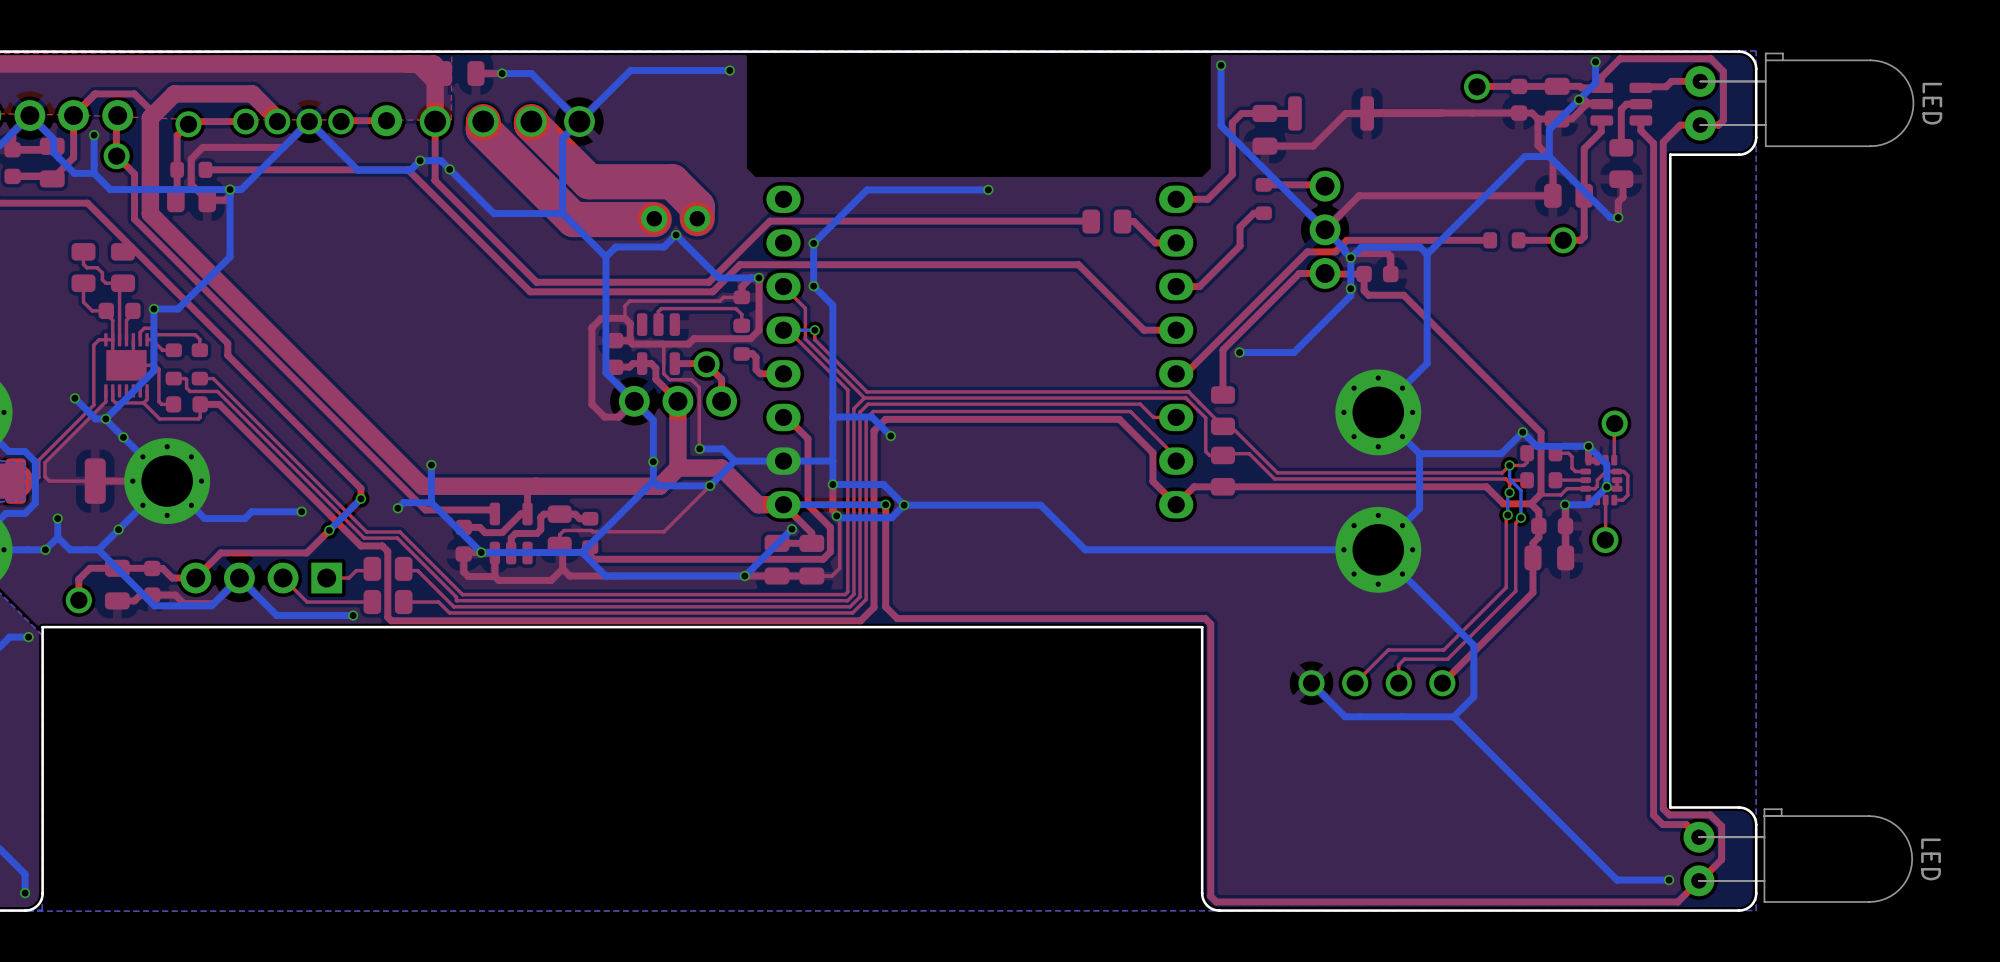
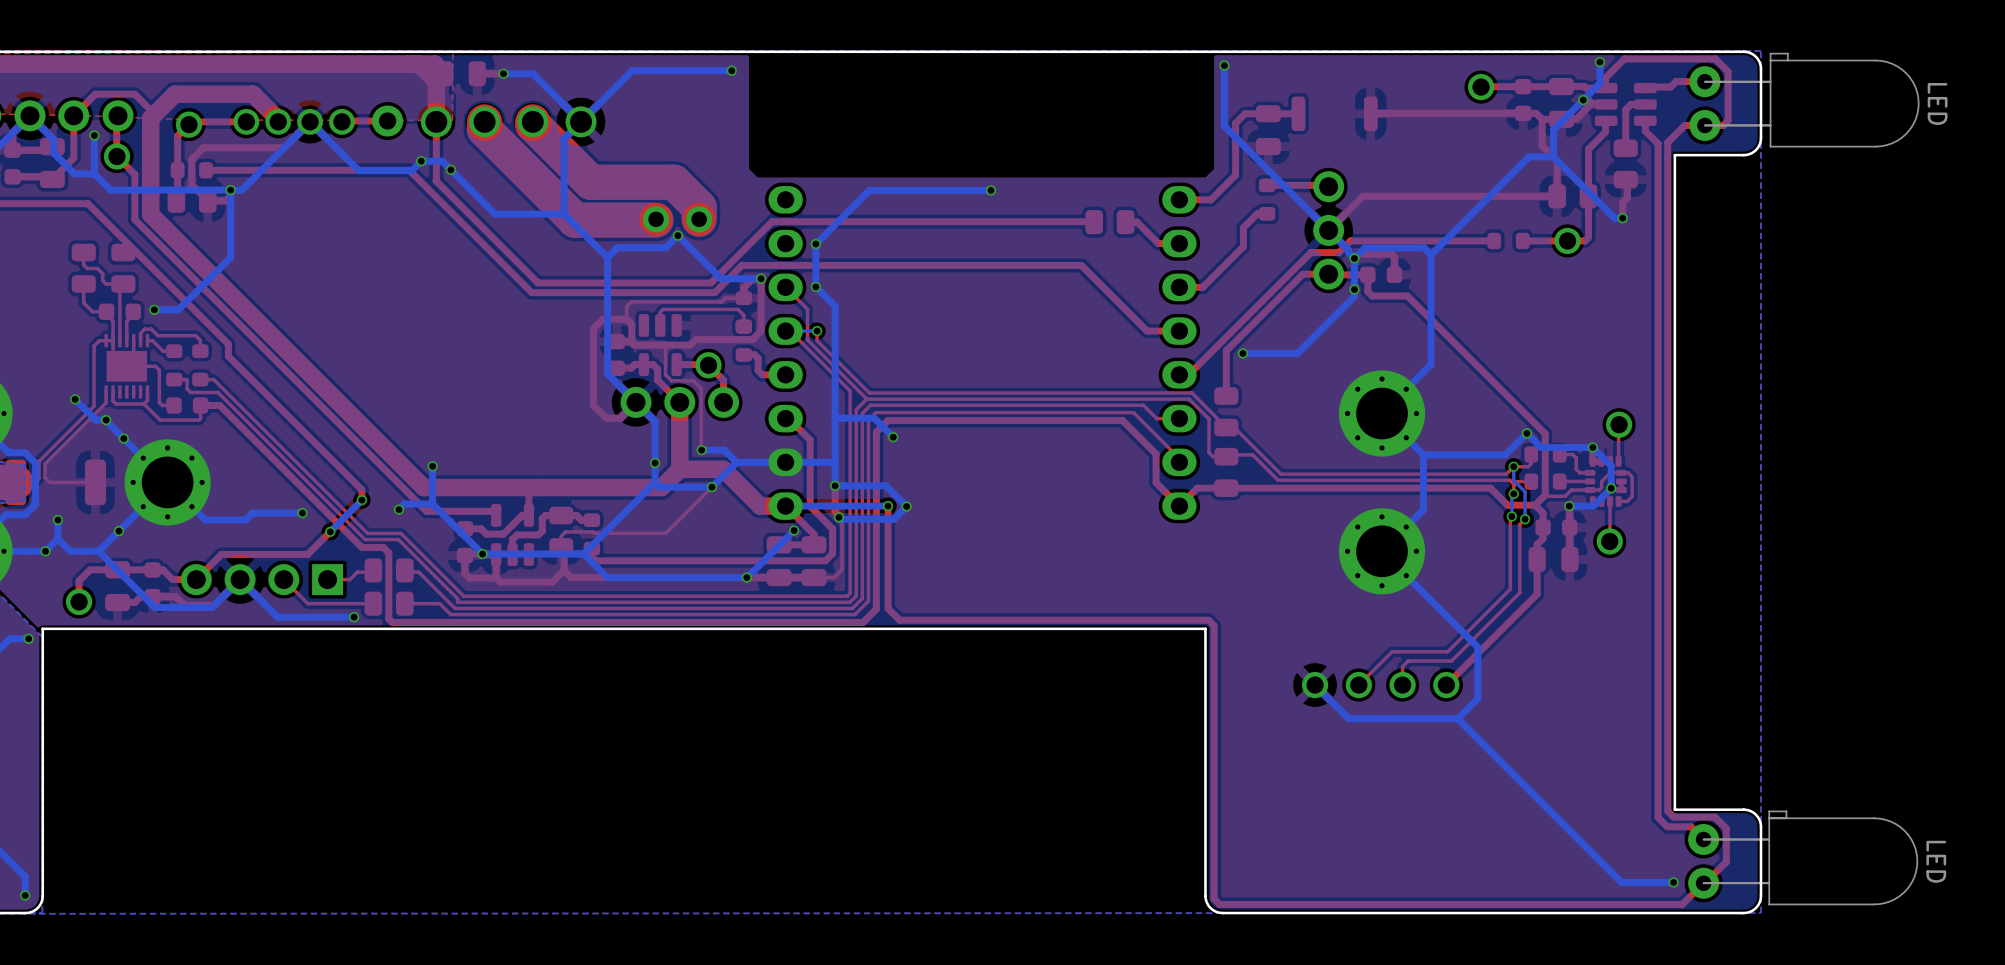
top track: (1367, 113) (1345, 113) (1313, 146) (1264, 146) -> none
bottom track: (153, 308) (153, 370) (105, 418) -> none
top track: (132, 481) (95, 481) -> none
bottom track: (904, 505) (1040, 505) (1085, 549) (1343, 549) -> none

